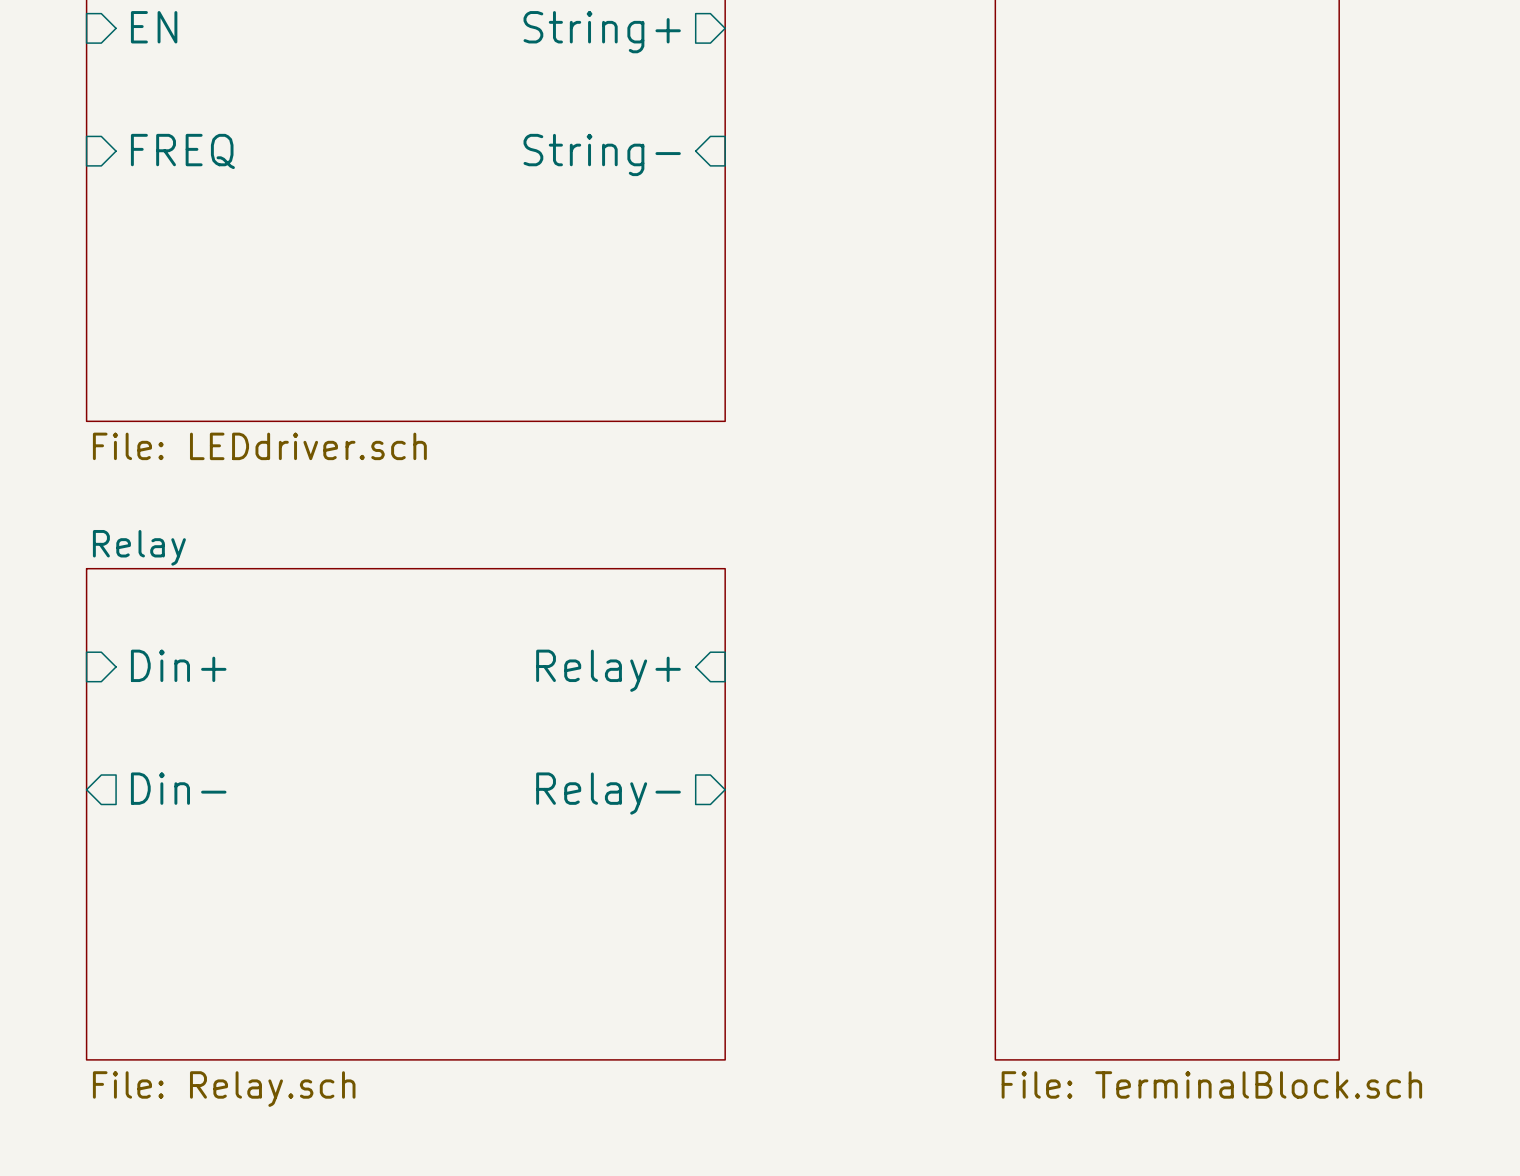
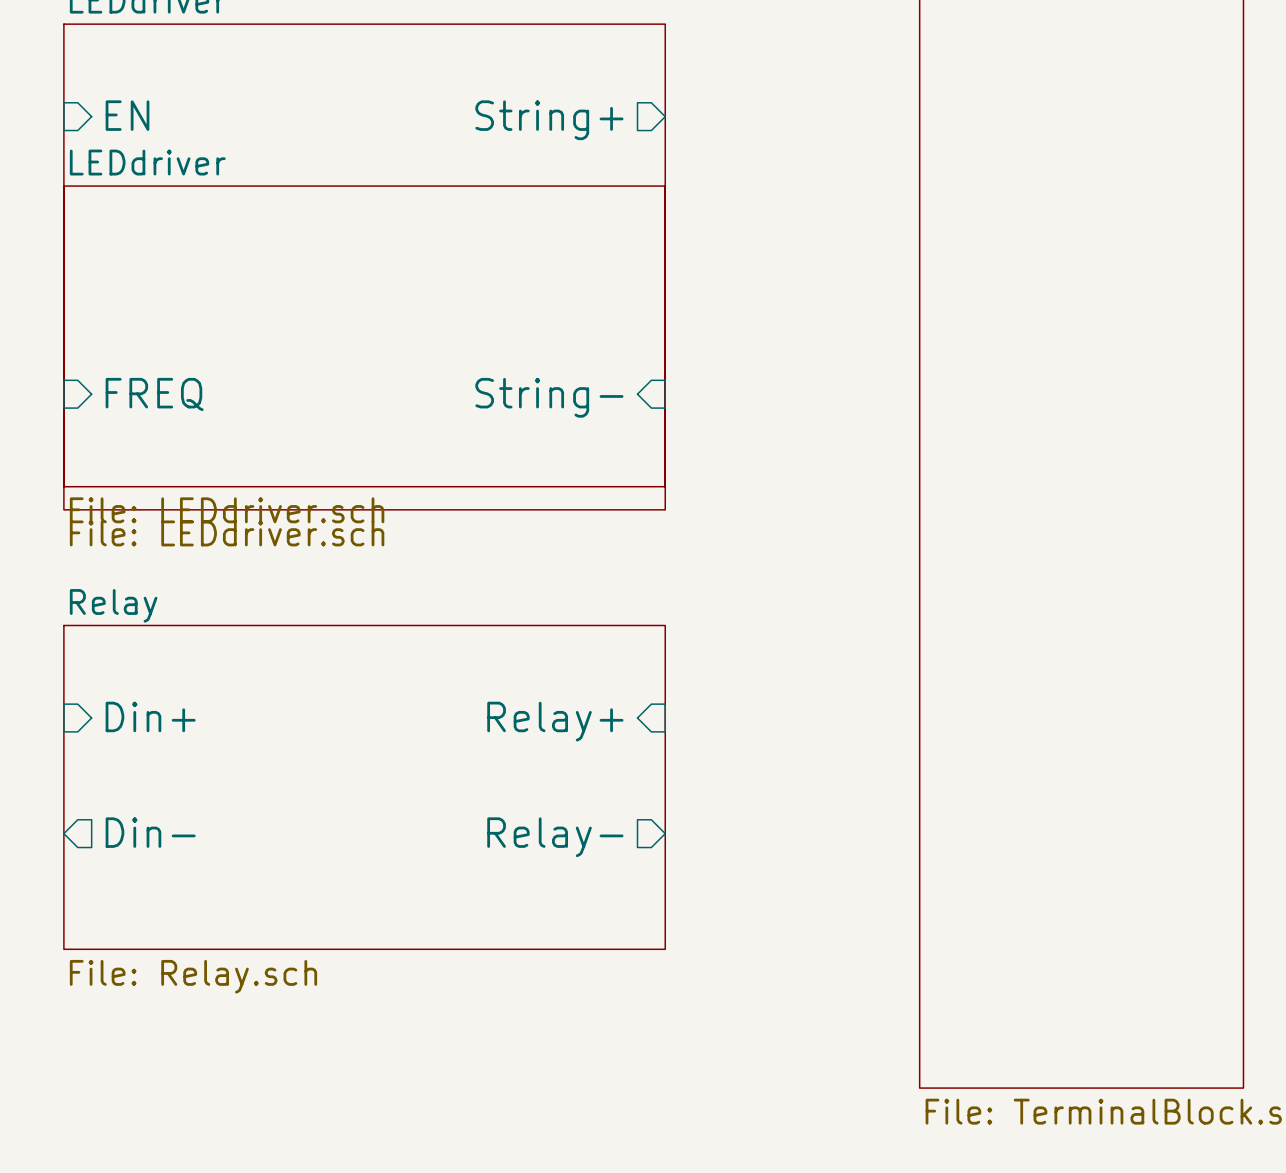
sheet pin position: FREQ (182, 151) -> FREQ (154, 394)
sheet pin position: String- (602, 154) -> String- (549, 397)
sheet LEDdriver: none -> File: LEDdriver.sch (364, 347)
sheet Relay: none -> File: Relay.sch (364, 787)
sheet Relay: File: Relay.sch (405, 814) -> none

